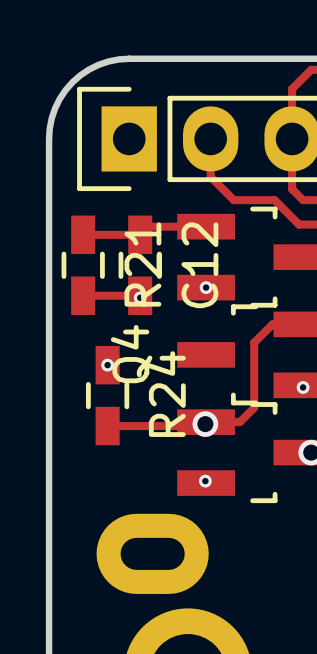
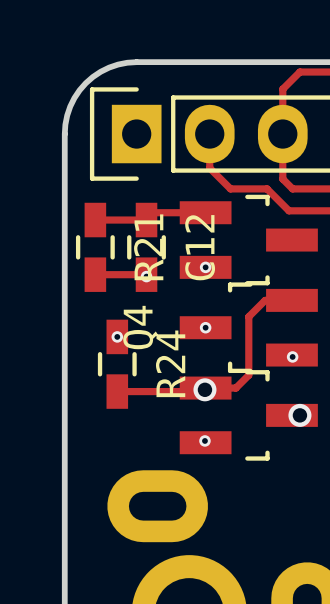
via: none -> (205, 327)

